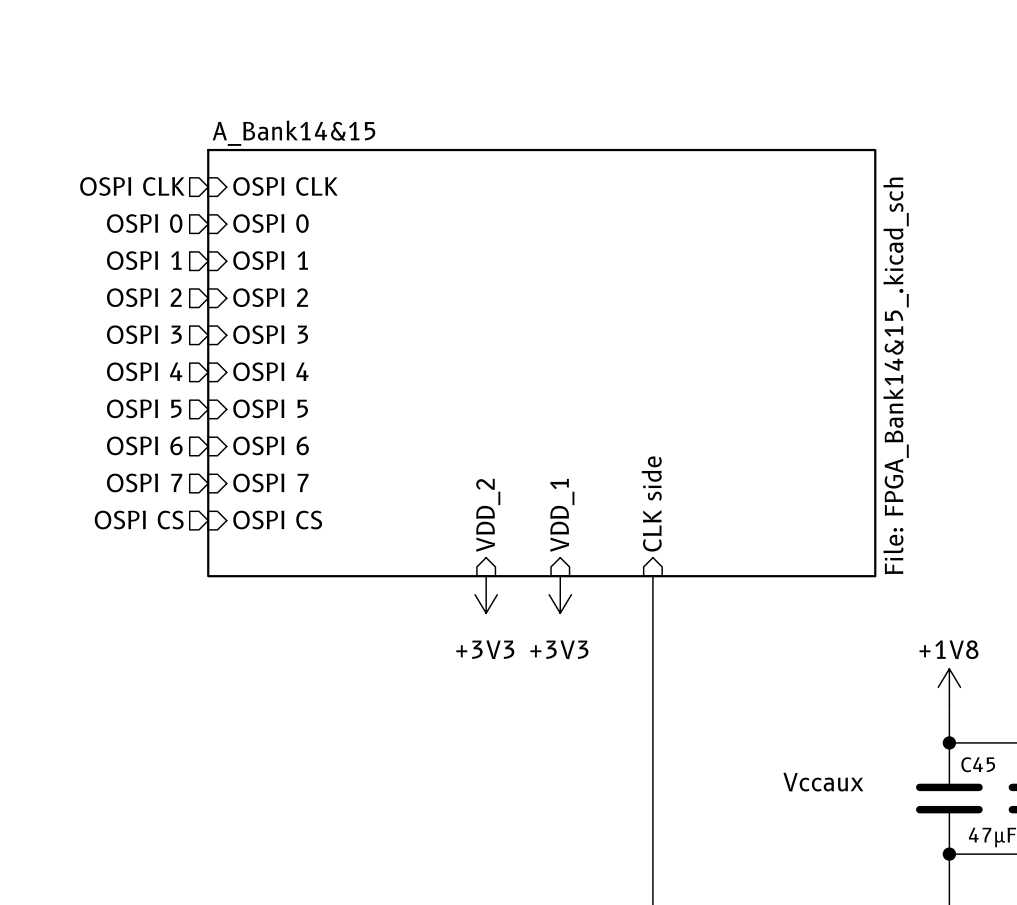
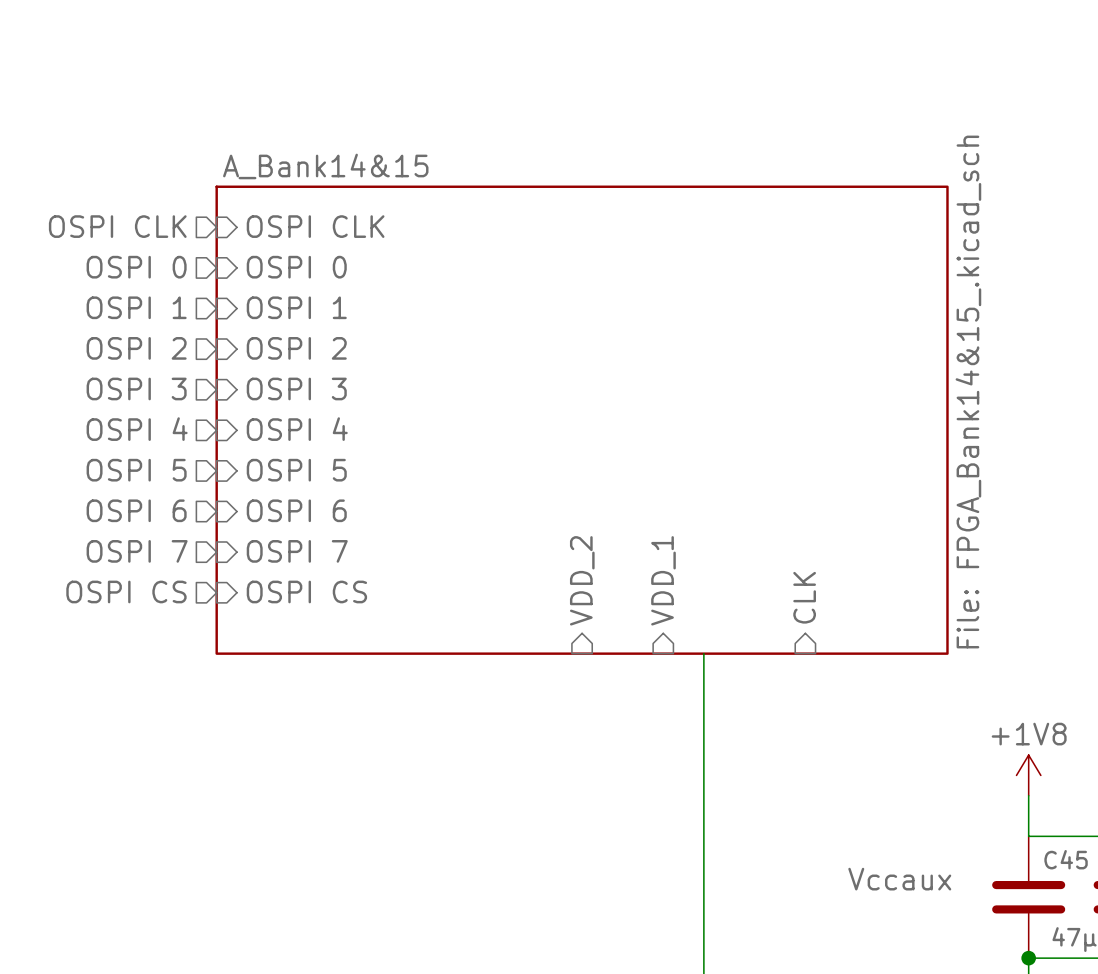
sheet pin: CLK side (651, 504) -> none
sheet pin position: VDD_2 (488, 515) -> VDD_2 (582, 580)
sheet pin position: VDD_1 (562, 515) -> VDD_1 (663, 580)
sheet pin: none -> CLK (804, 597)
power symbol: +3V3 (486, 594) -> none
power symbol: +3V3 (560, 594) -> none
junction: (949, 742) -> none

